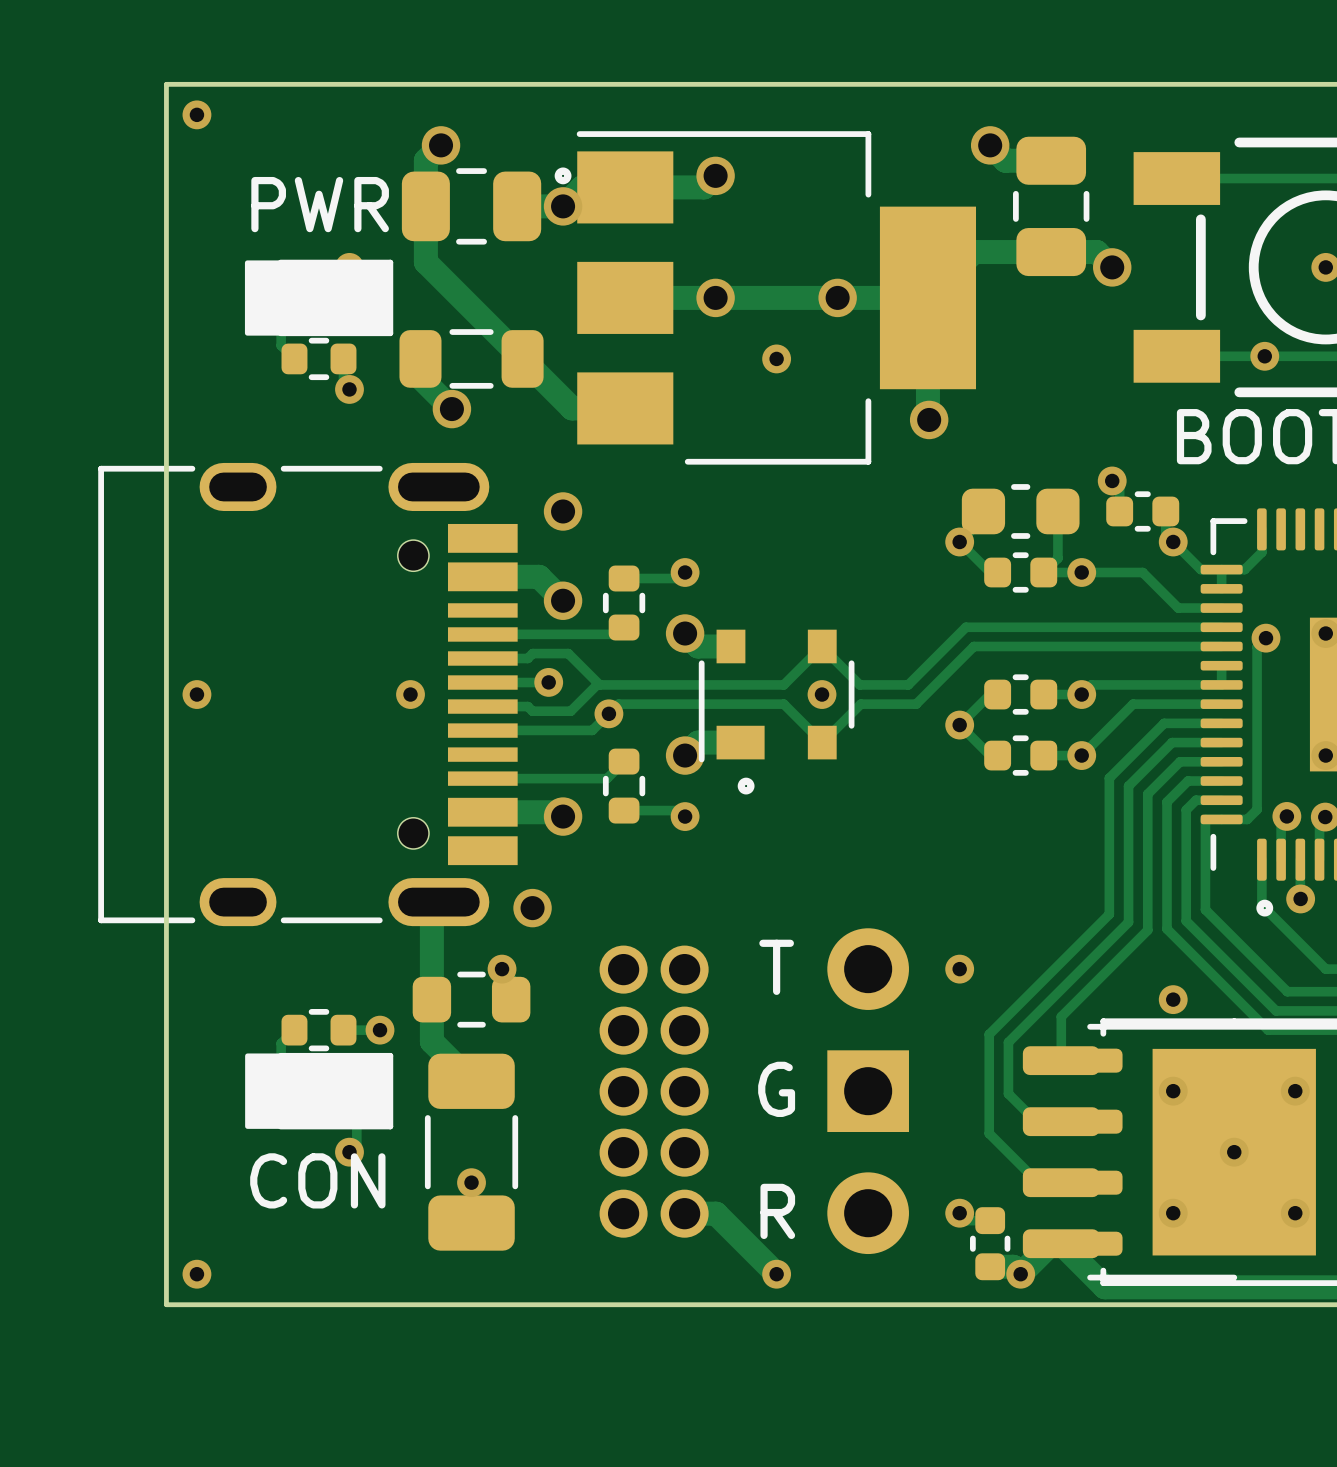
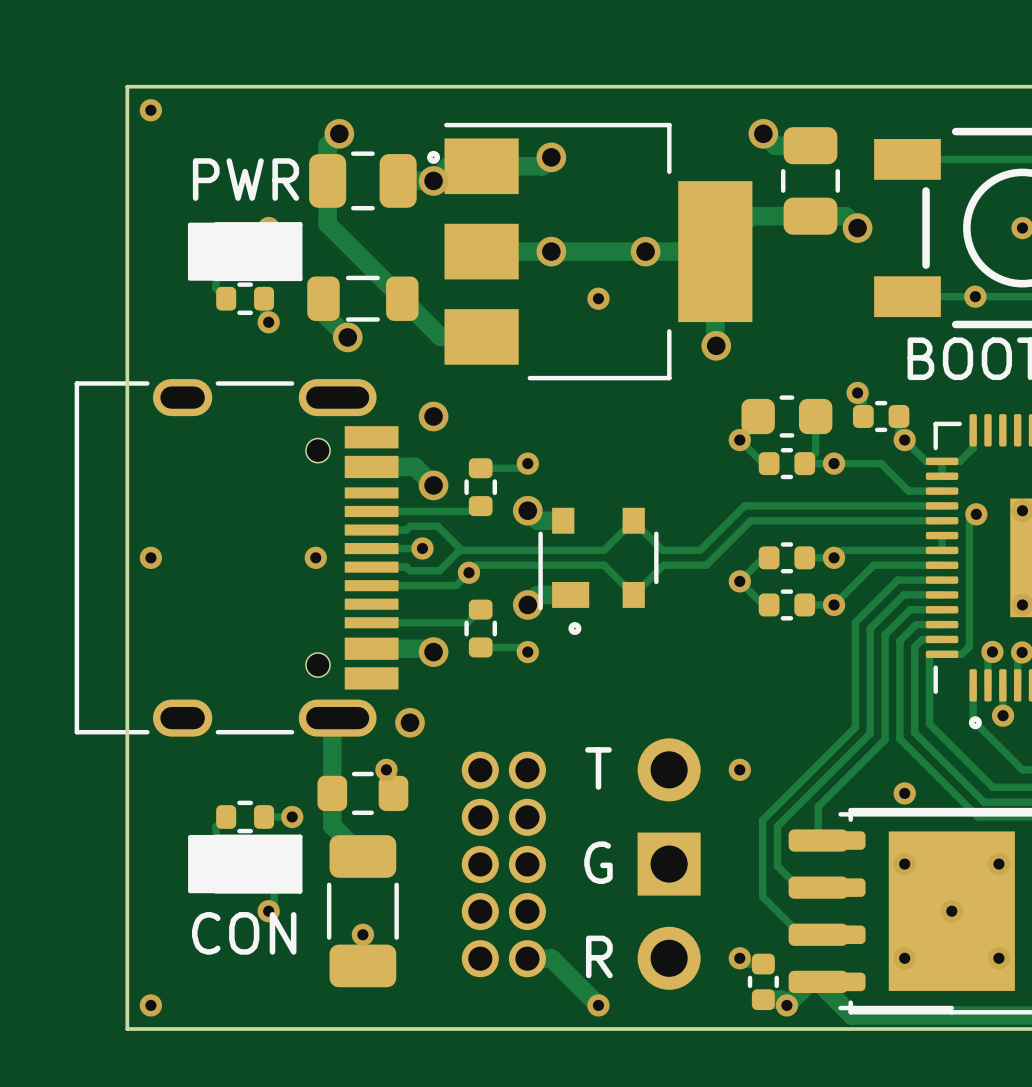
via: (822, 694) -> none

